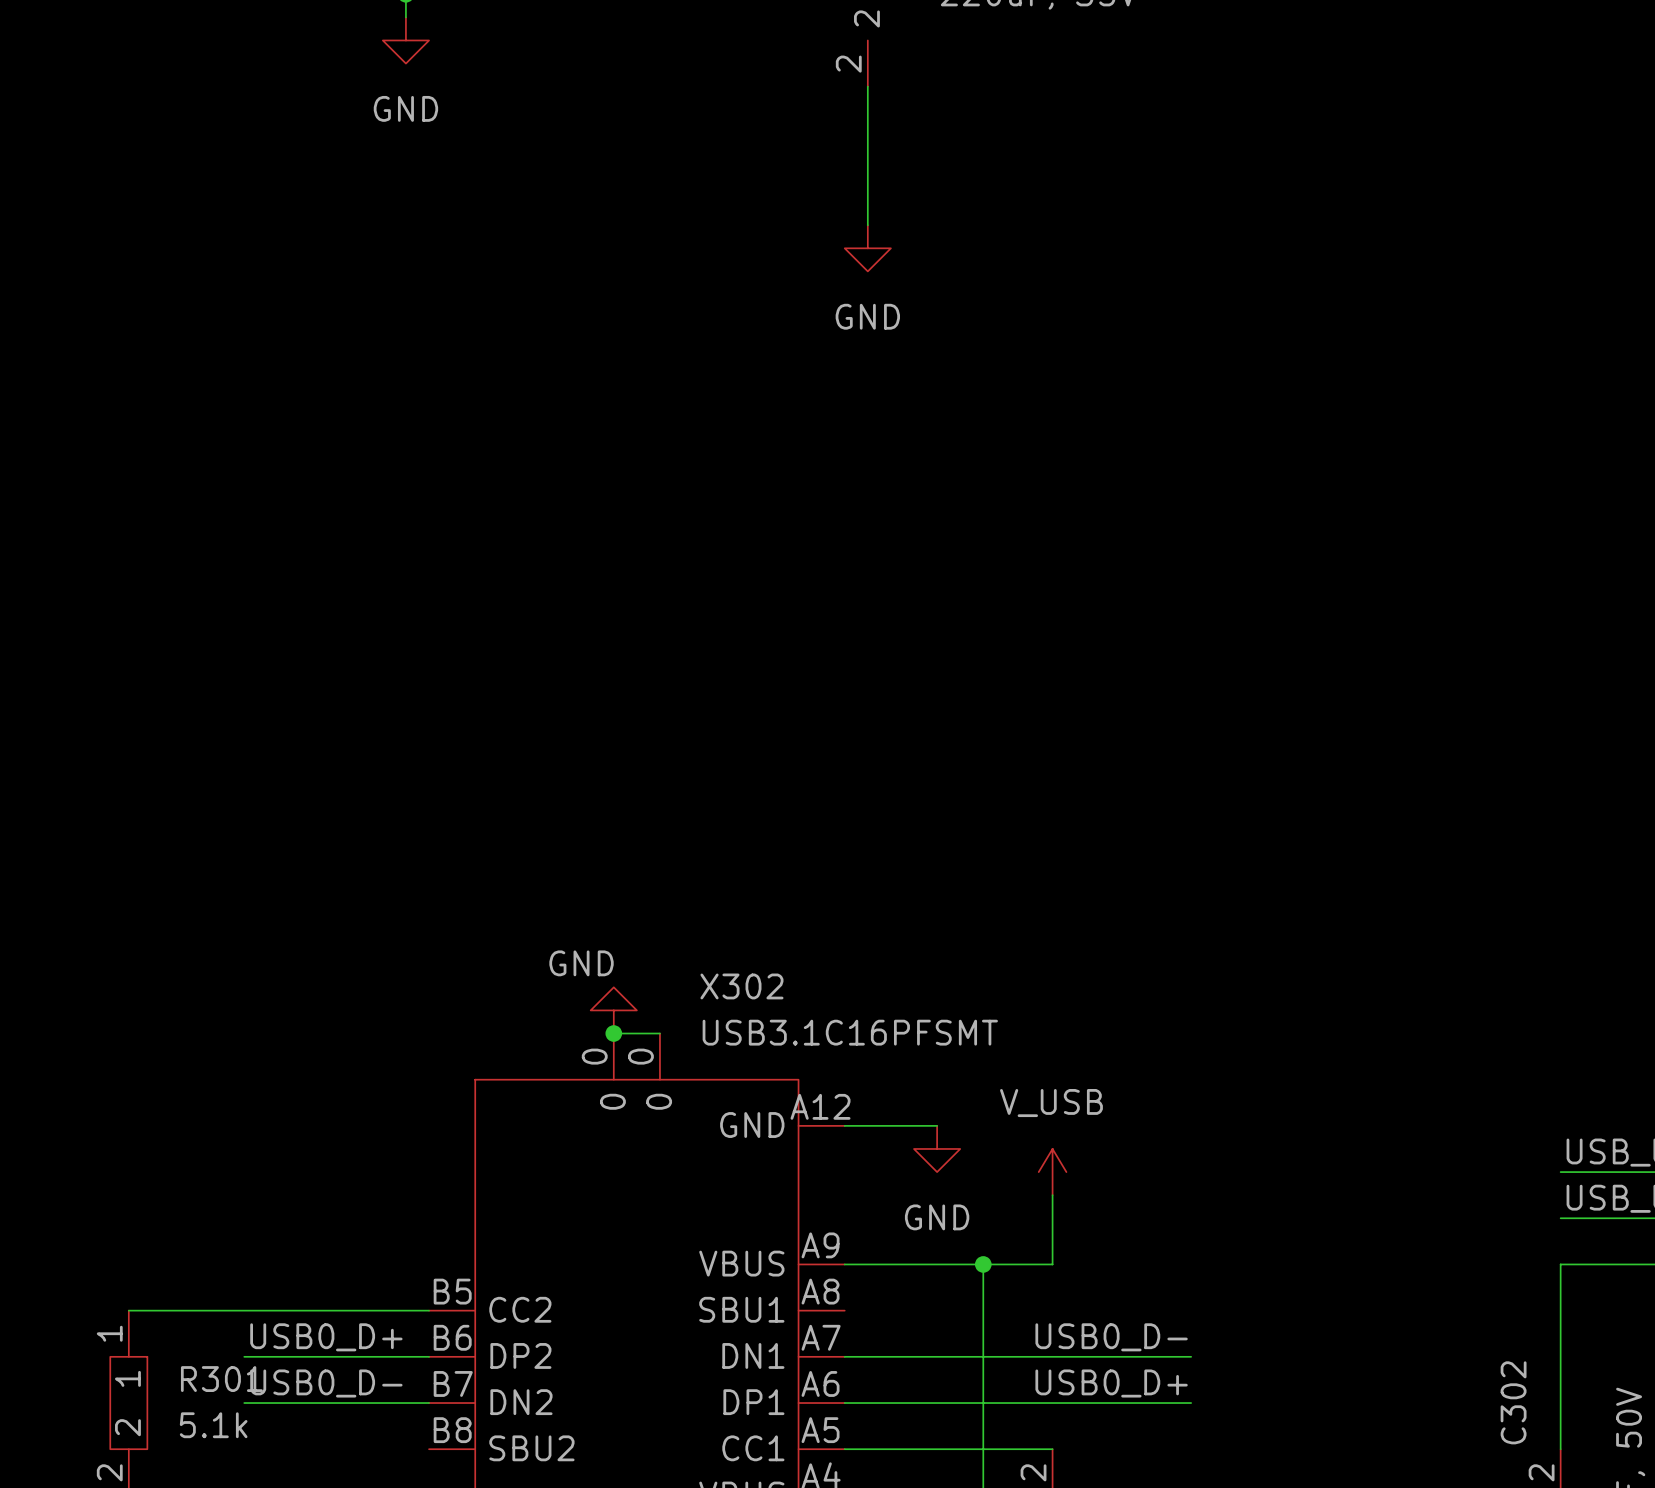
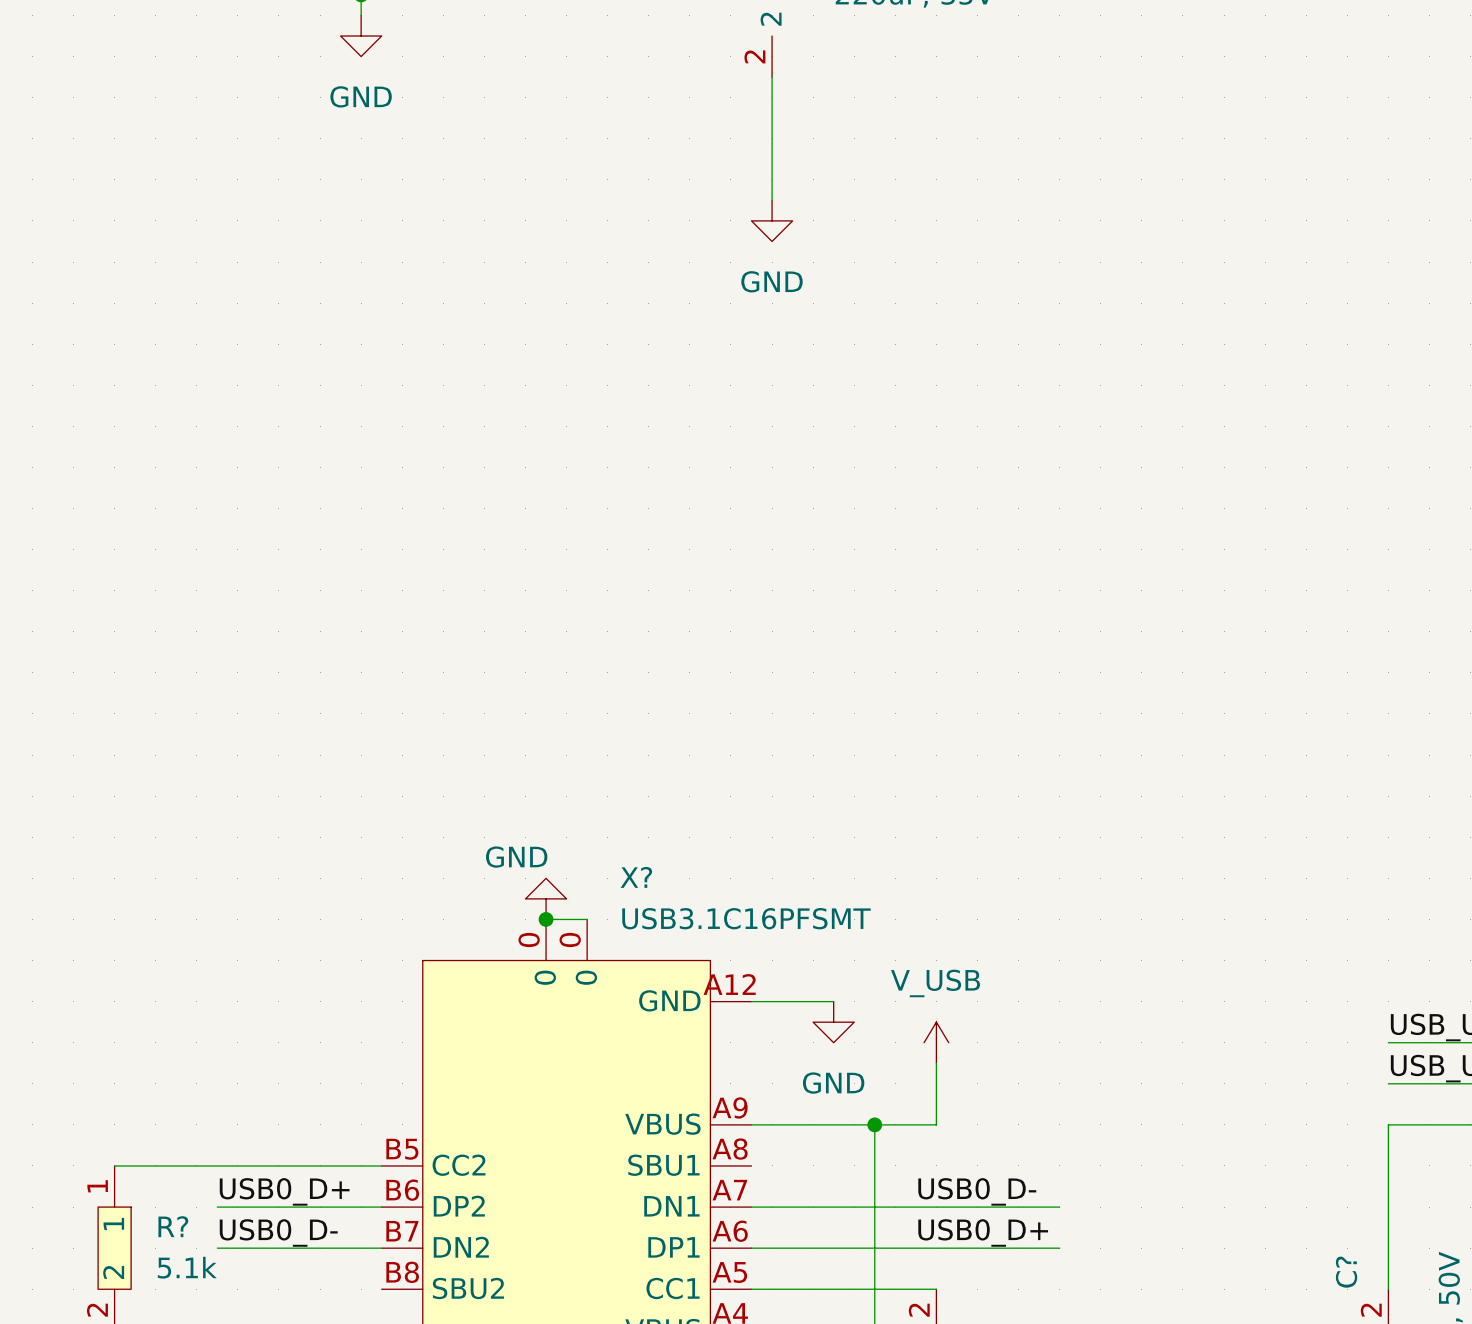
X302 name: X302 (741, 986) -> X? (636, 877)
R301 name: R301 (221, 1379) -> R? (173, 1226)
C302 name: C302 (1513, 1402) -> C? (1346, 1272)

